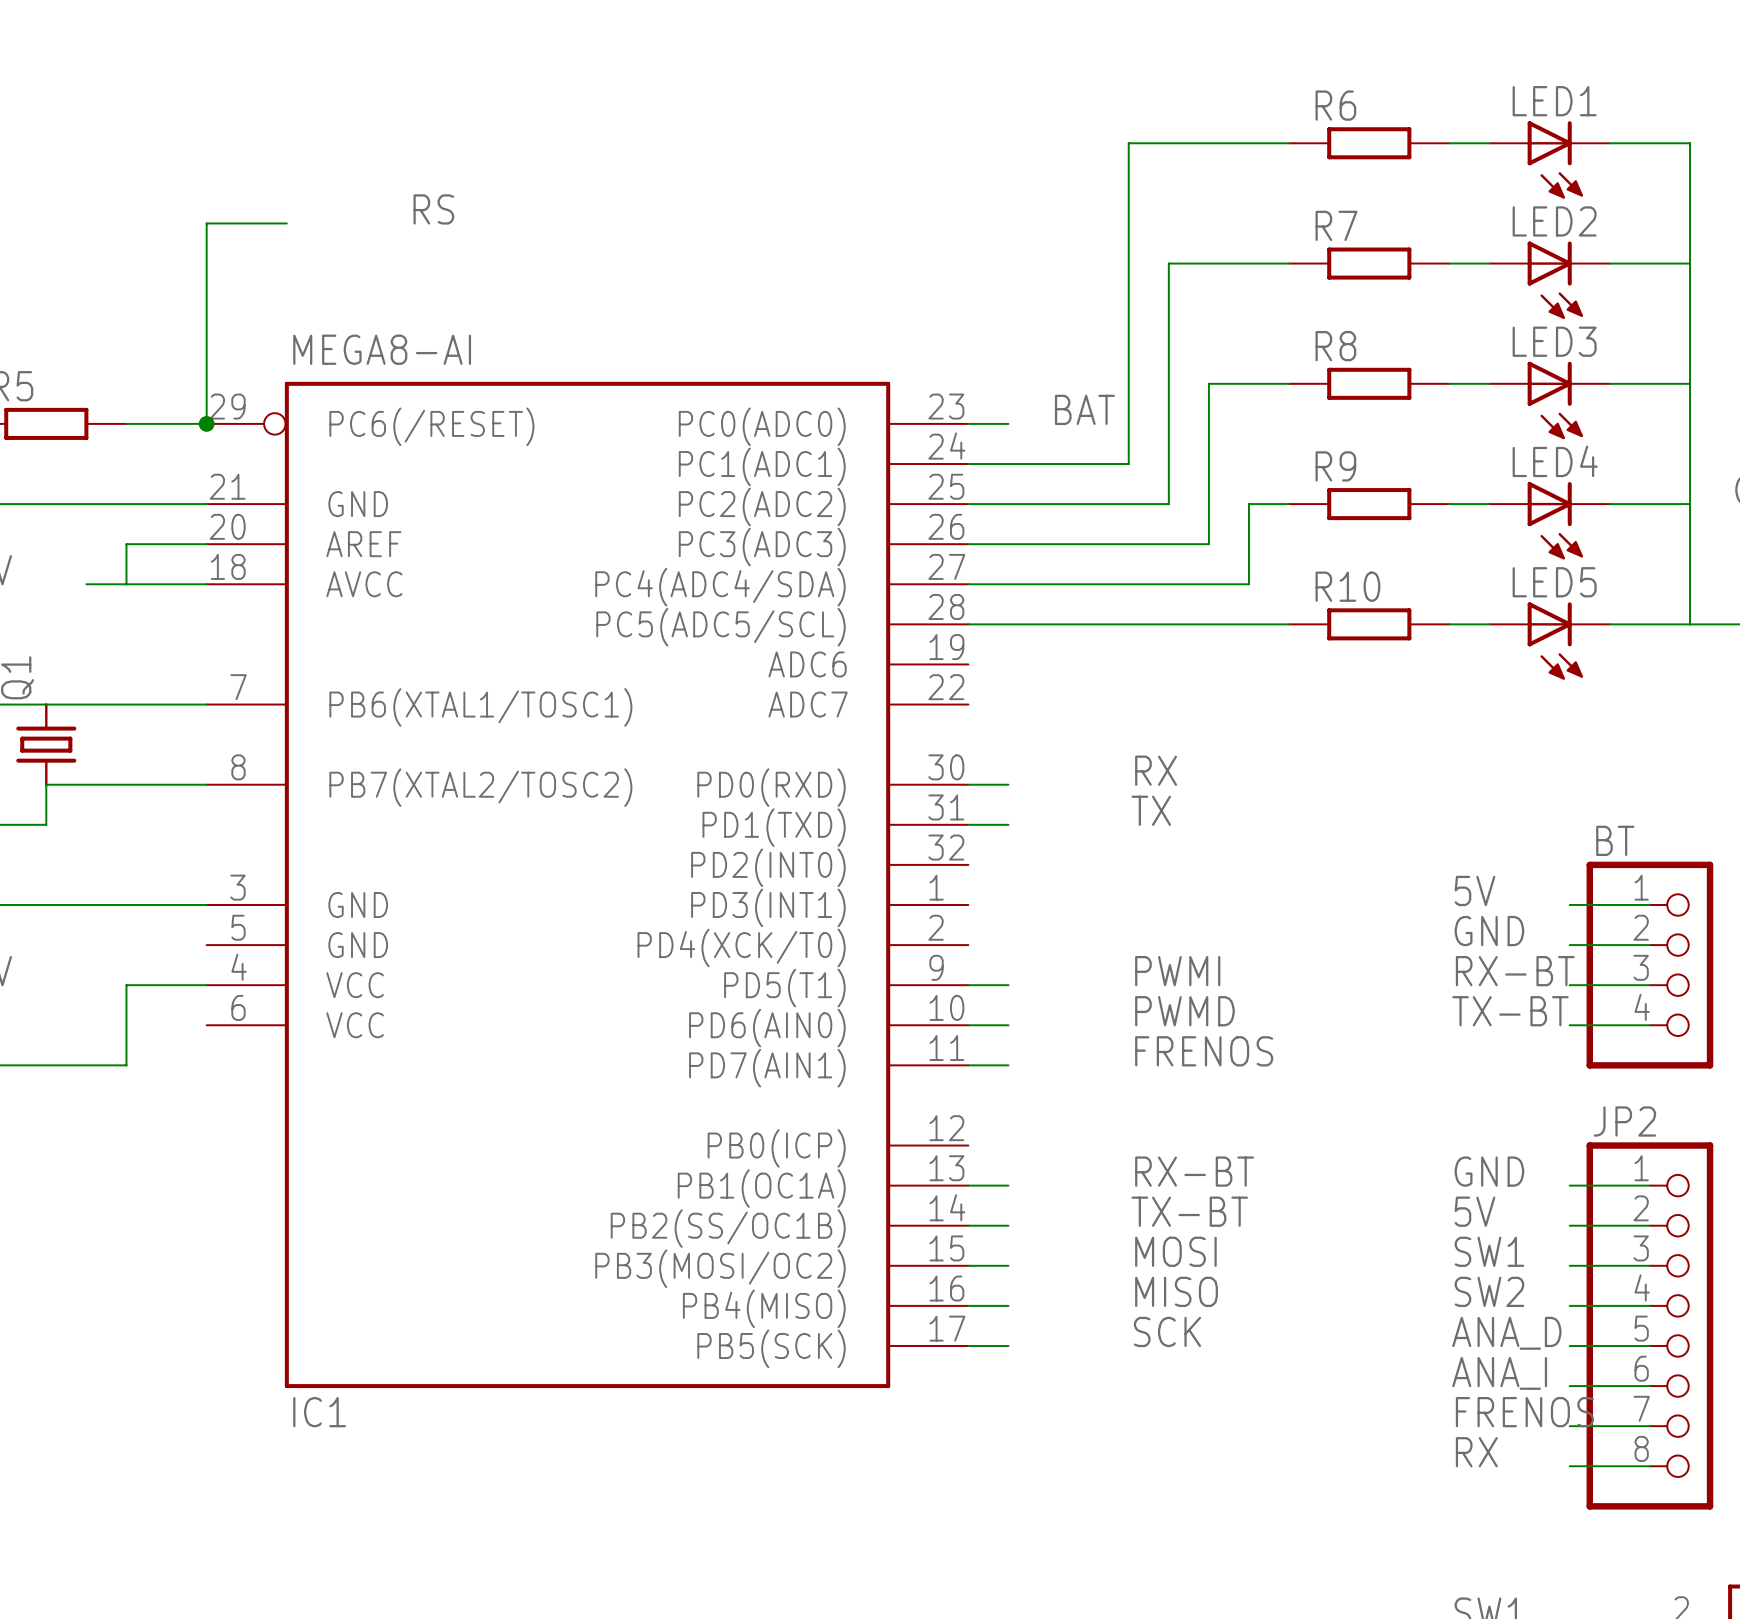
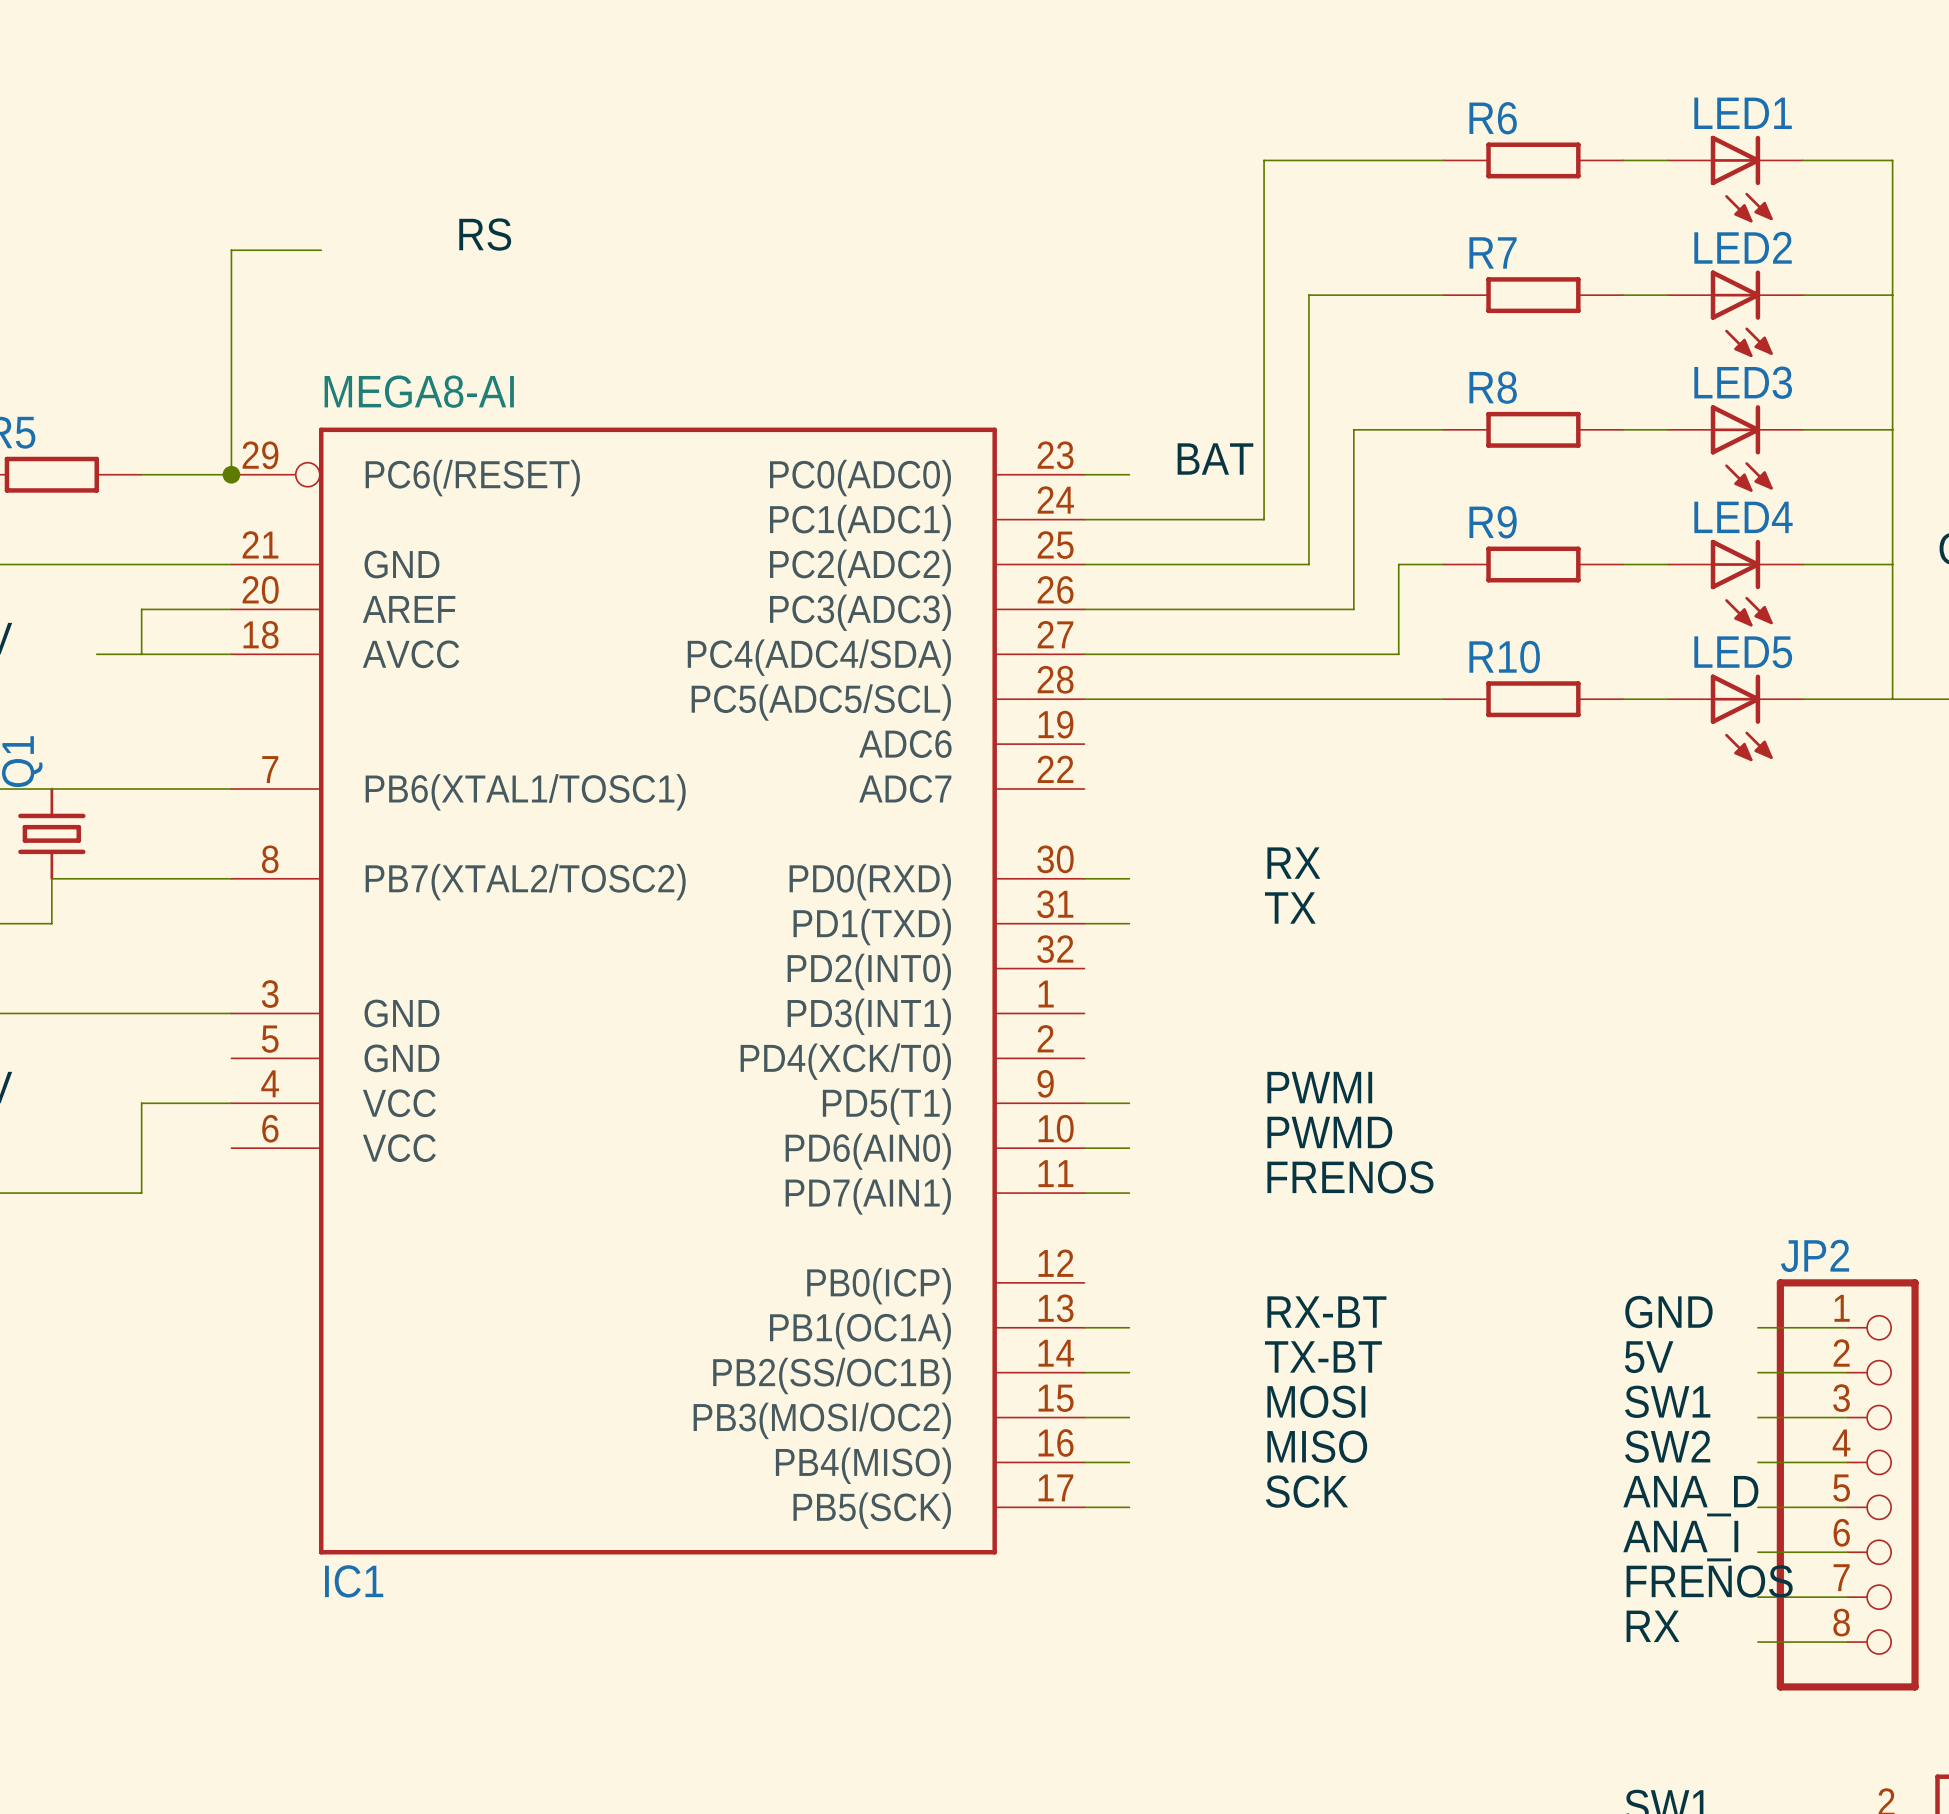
label: 5V (1474, 890) -> none
wire: (1569, 904) (1649, 904) -> none
label: GND (1489, 931) -> none
wire: (1569, 945) (1649, 945) -> none
BT: (1649, 965) -> none
label: RX-BT (1515, 971) -> none
wire: (1569, 985) (1649, 985) -> none
label: TX-BT (1510, 1011) -> none
wire: (1569, 1025) (1649, 1025) -> none

